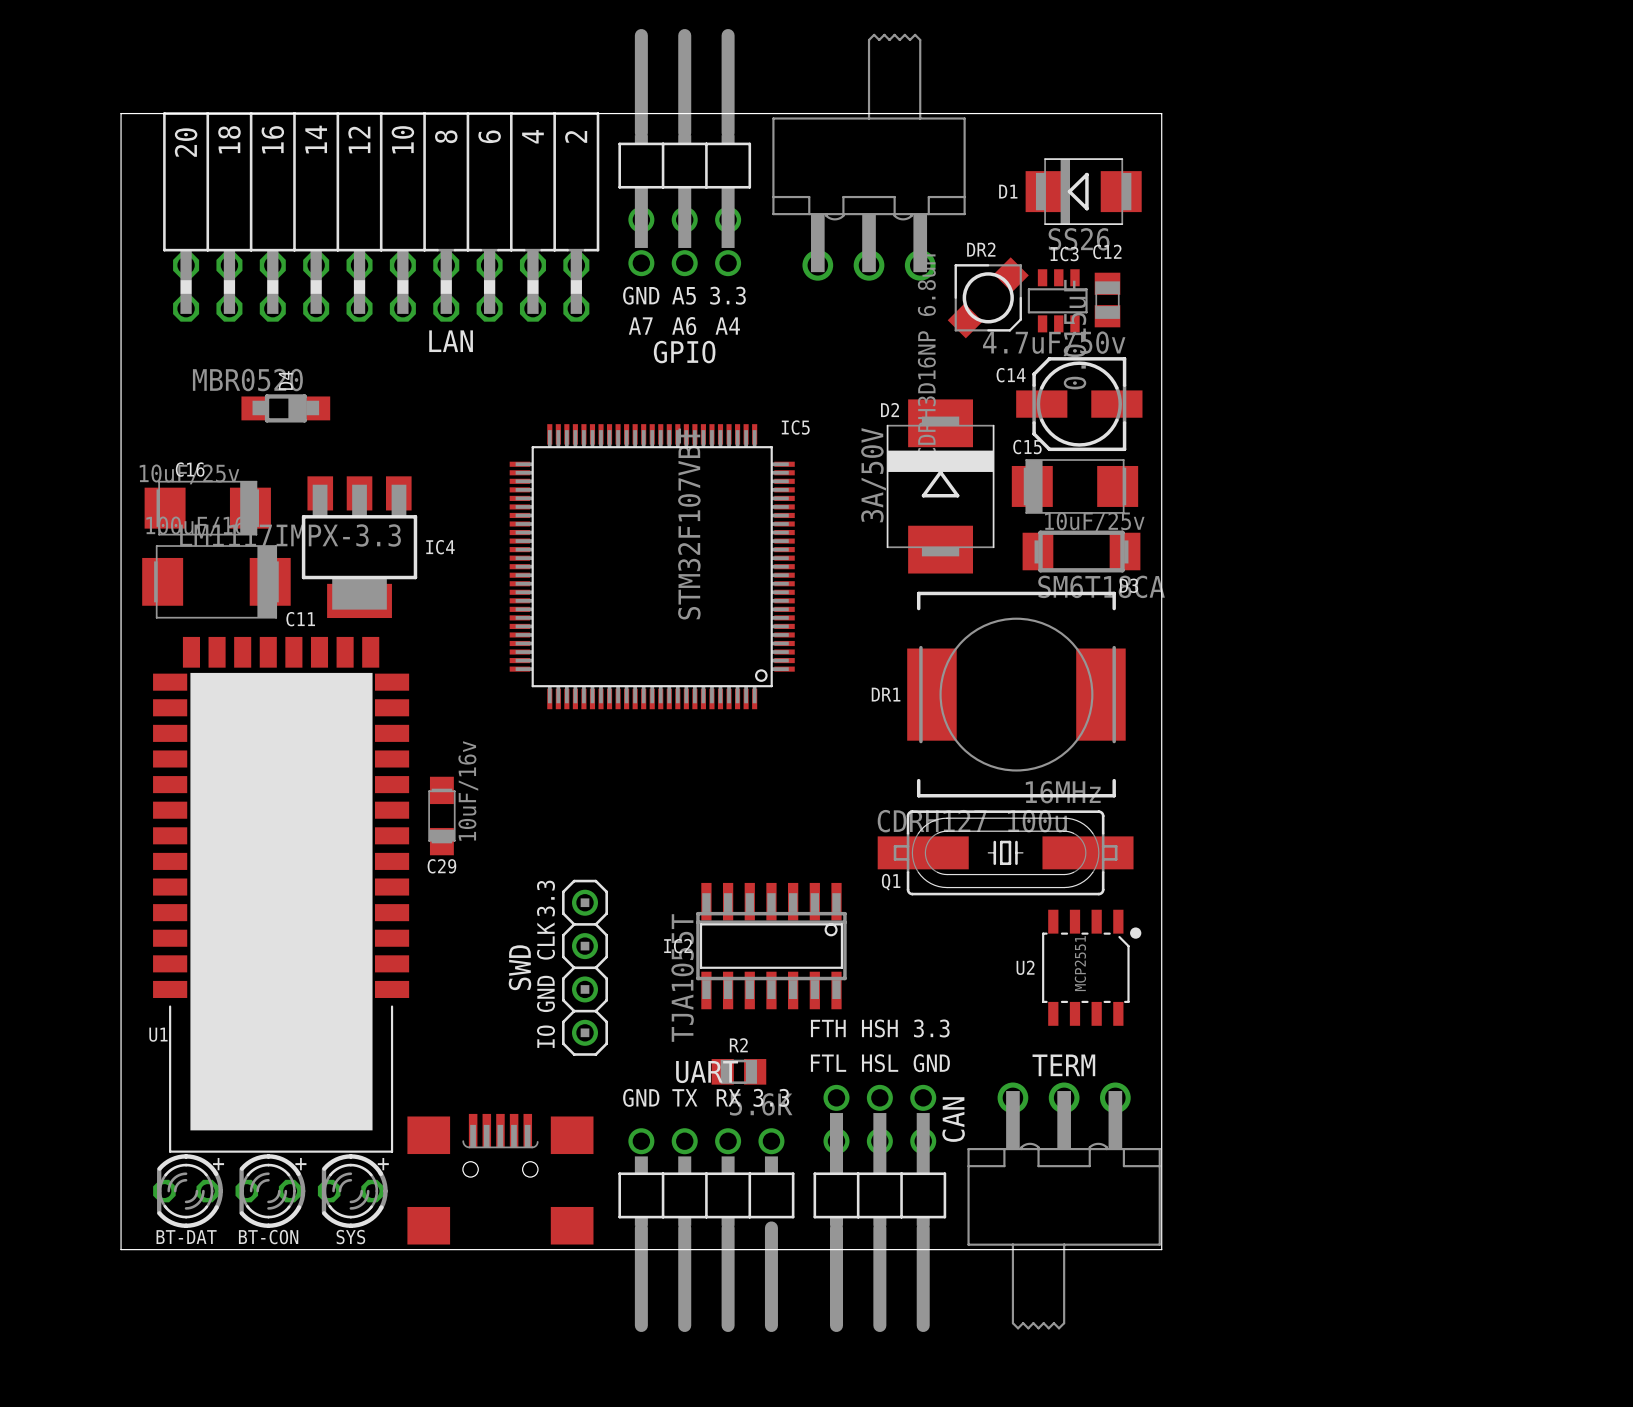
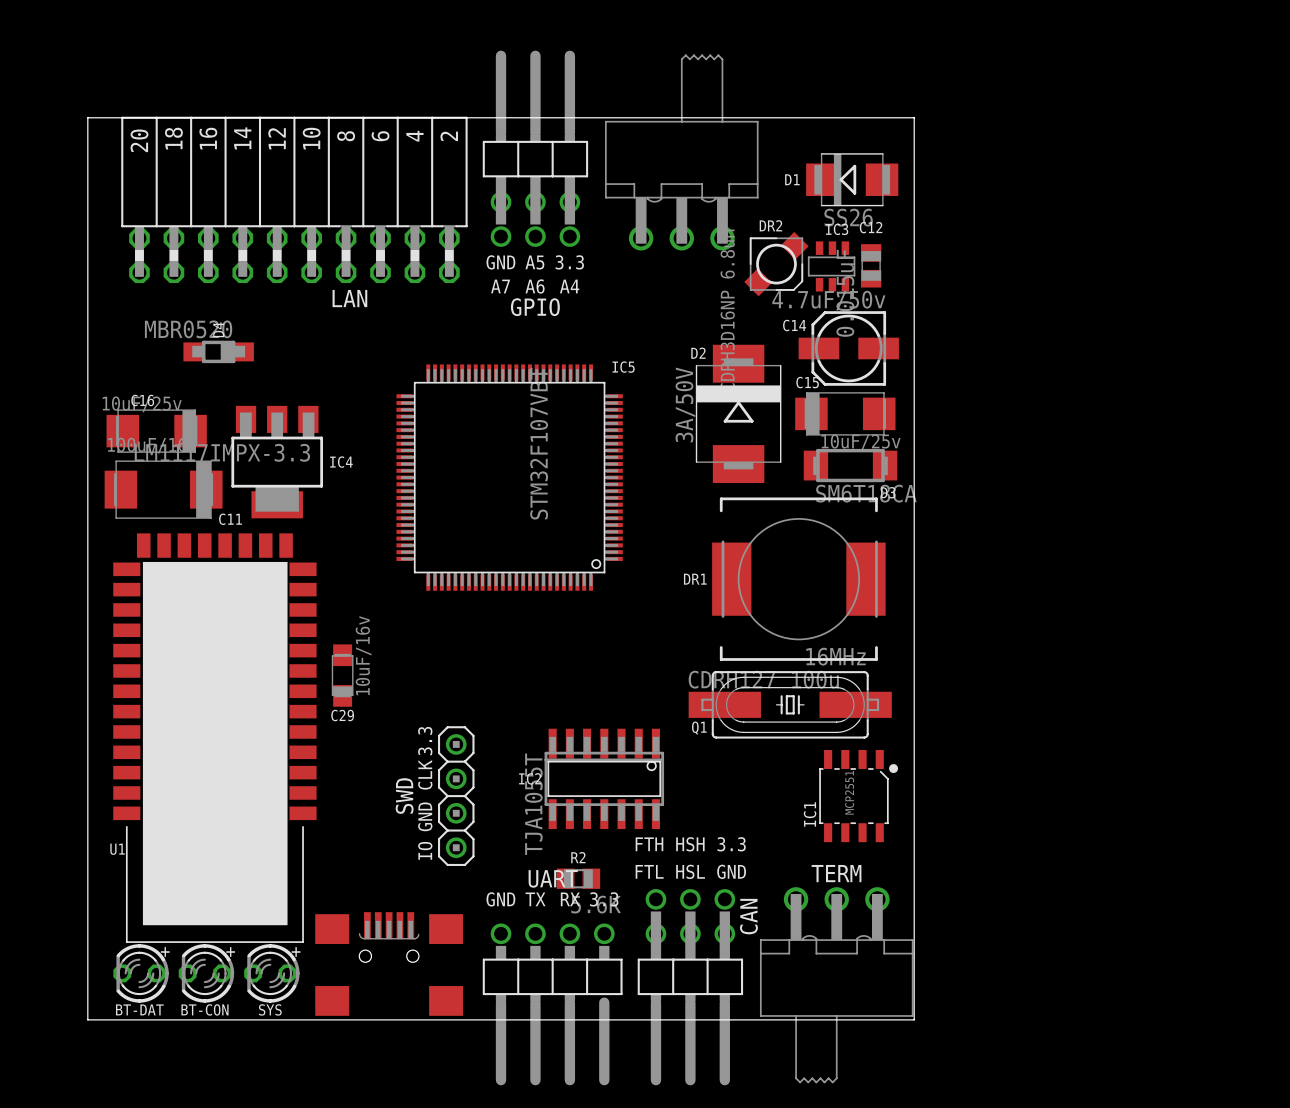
U2 name: U2 (1025, 967) -> IC1 (810, 814)

